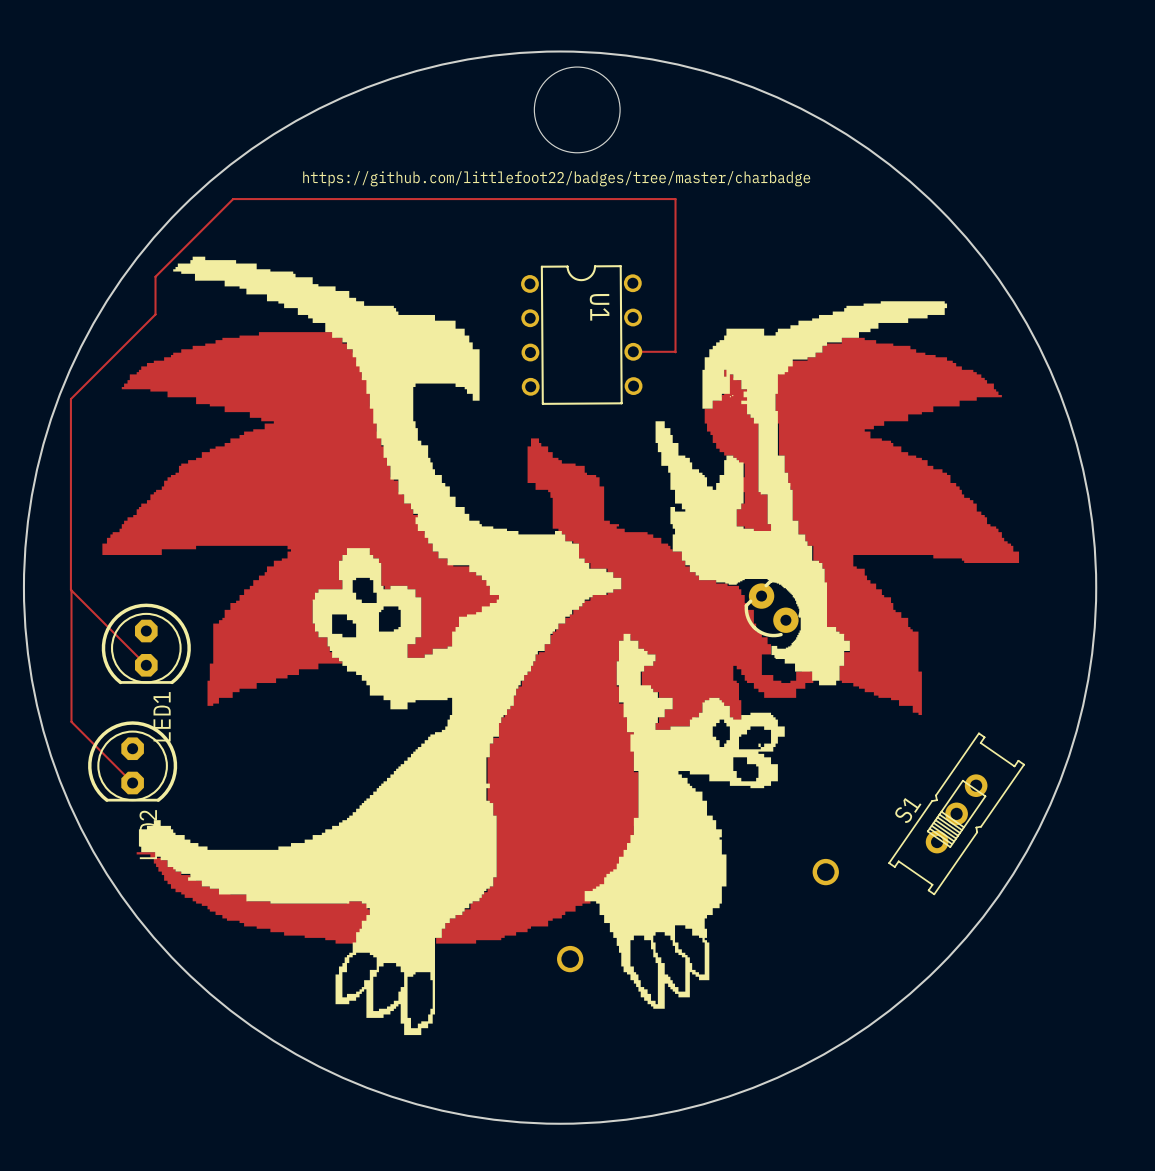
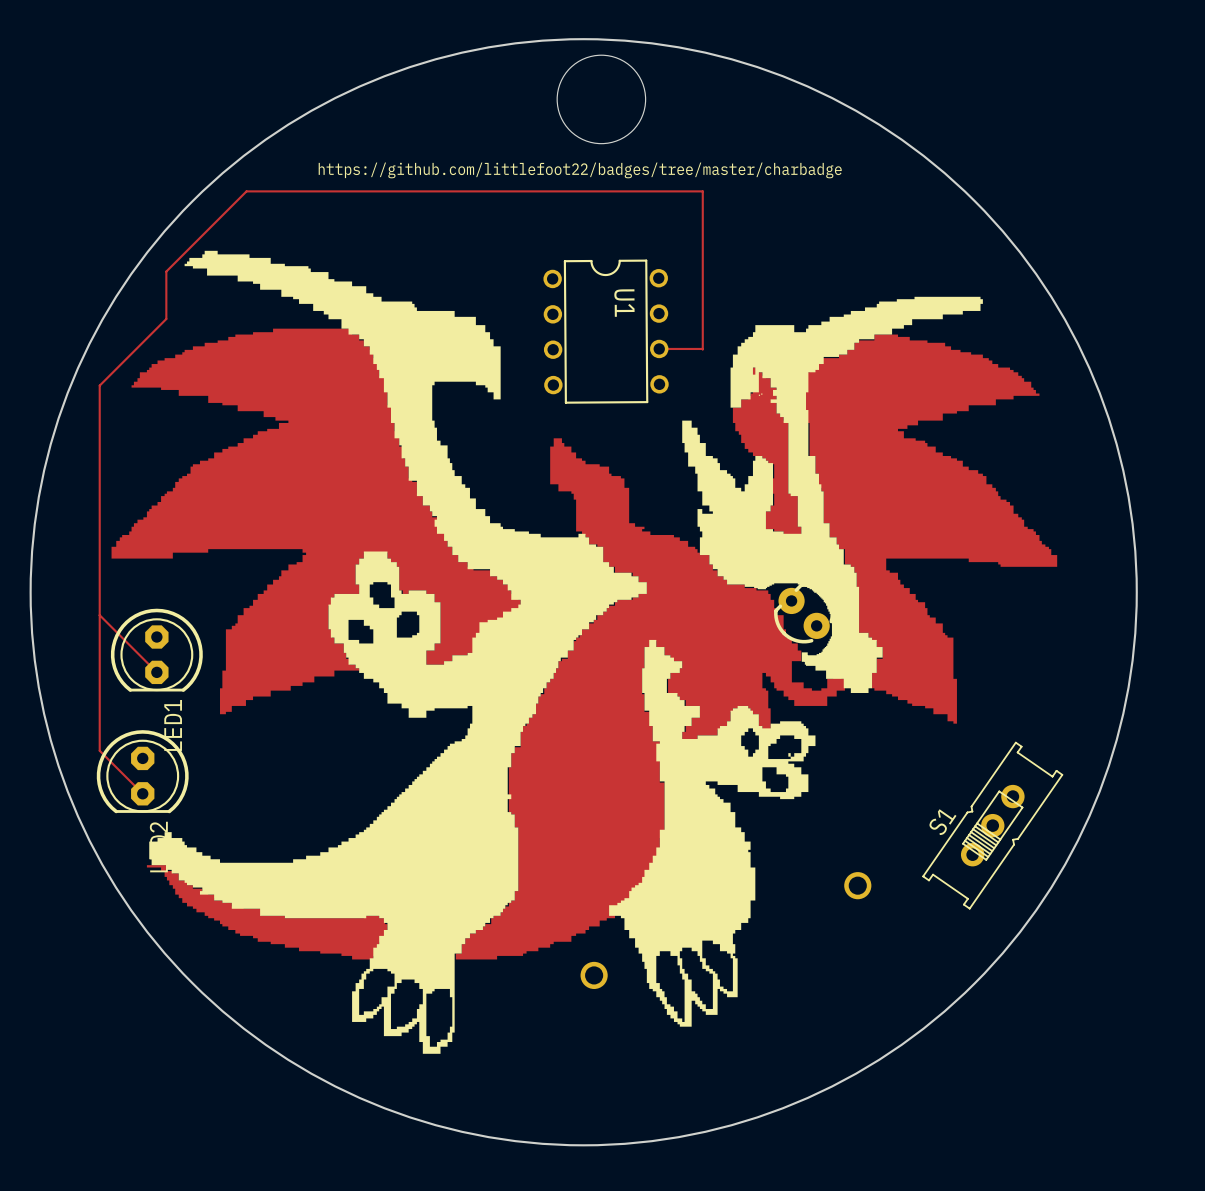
track: (155, 314) (70, 399) (70, 589) (90, 609) -> (166, 310) (166, 319) (99, 385) (99, 750)
track: (71, 590) (71, 721) (90, 741) -> none

